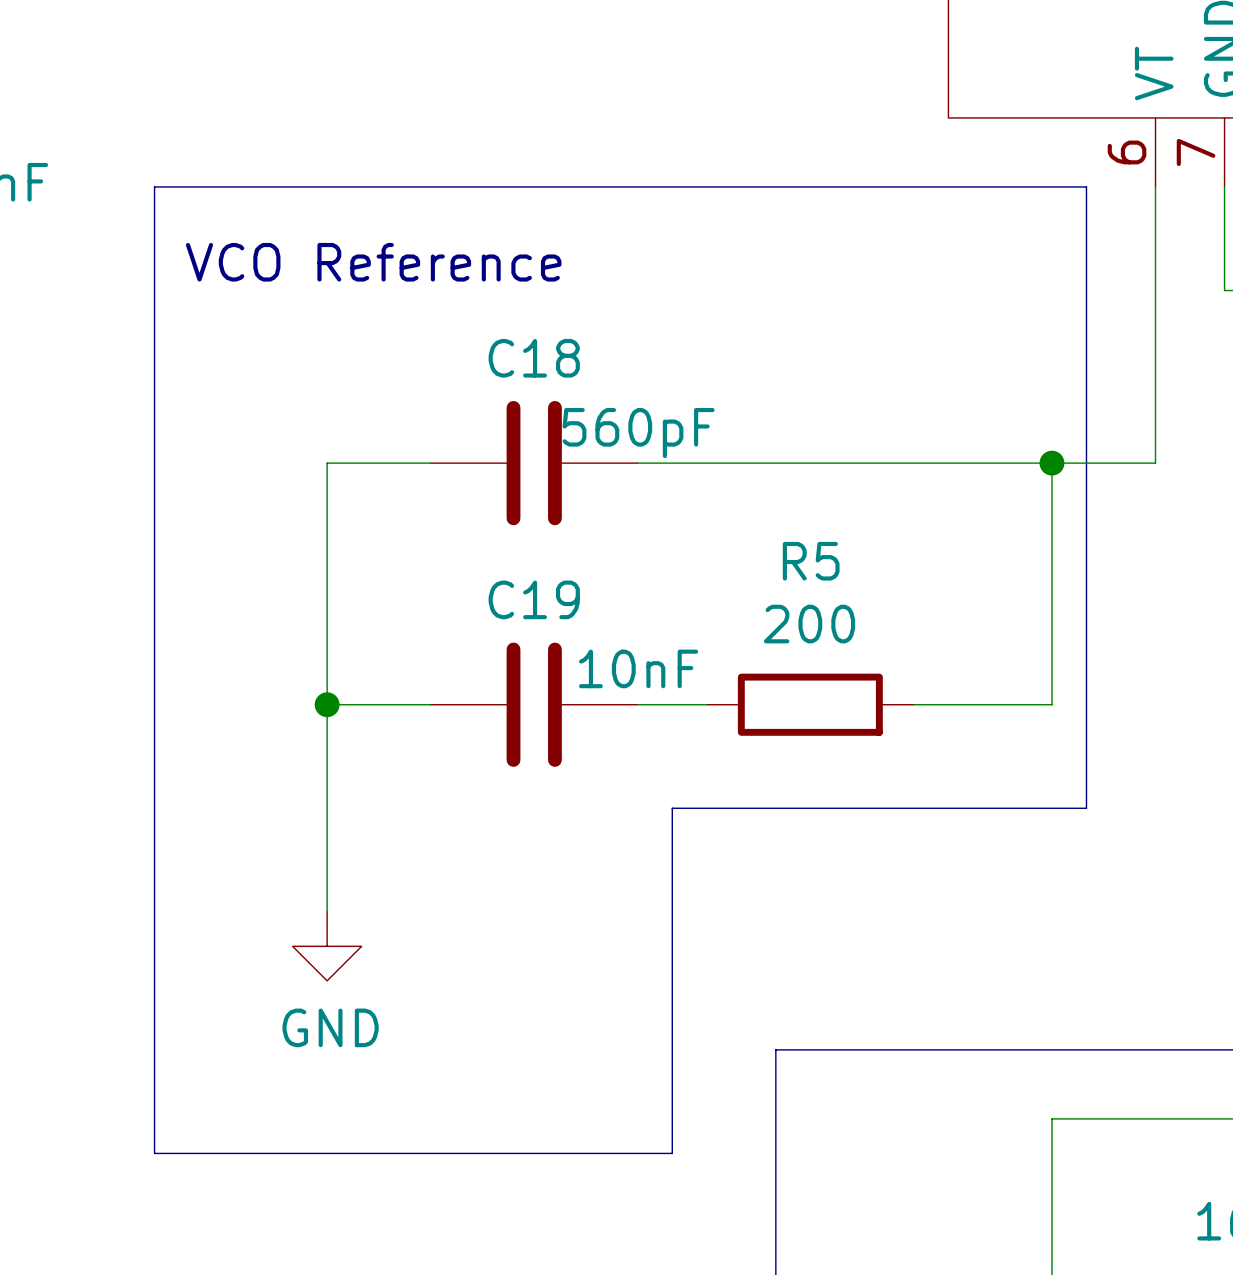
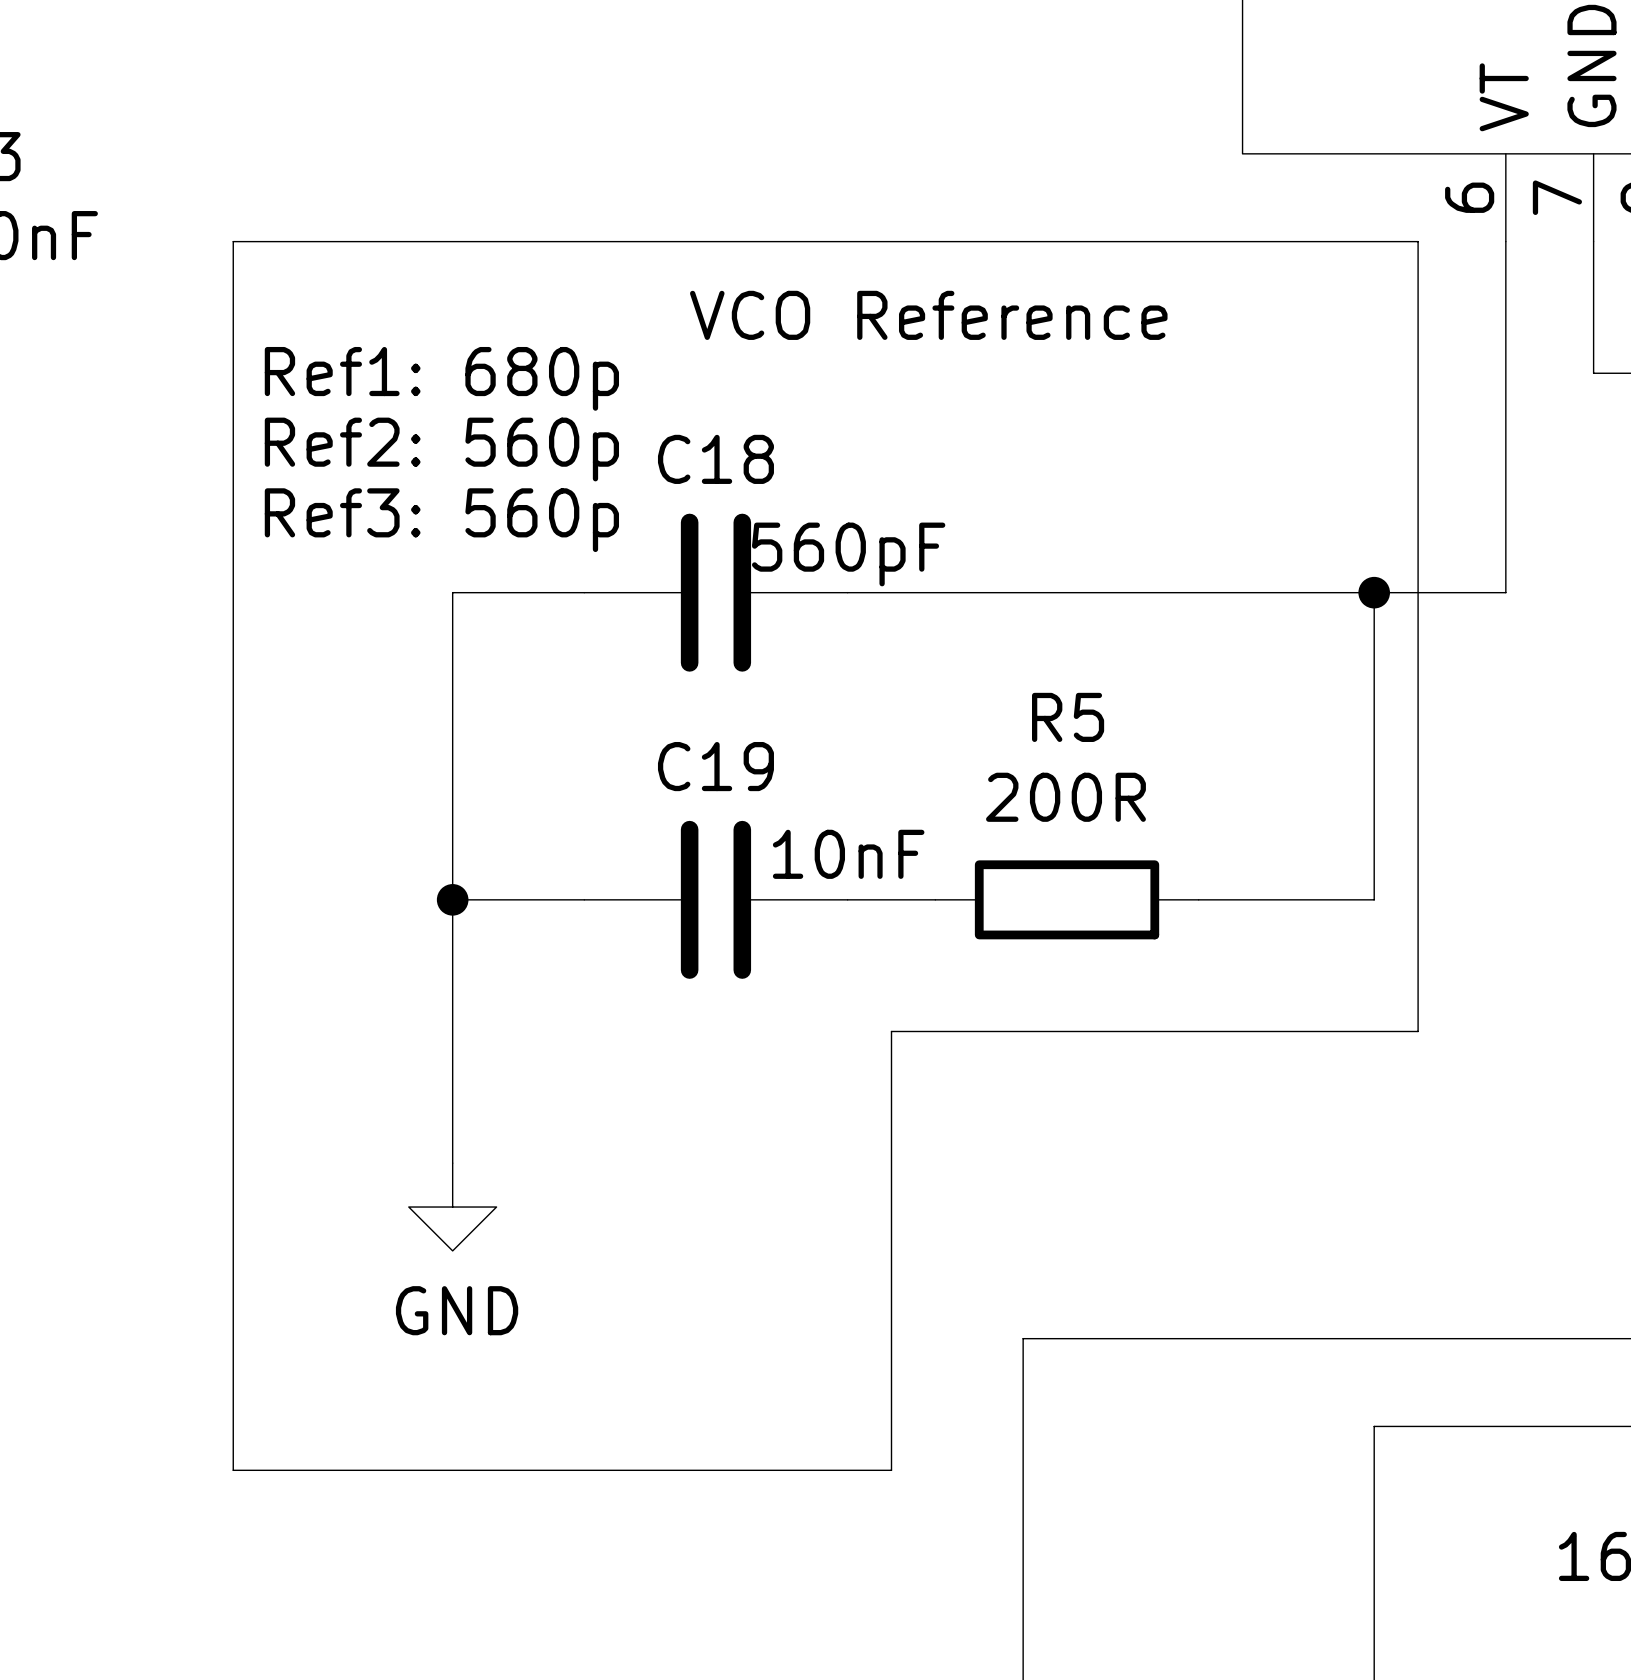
text position: VCO Reference (373, 262) -> VCO Reference (928, 315)
text: none -> Ref1: 680p (441, 378)
text: none -> Ref2: 560p (441, 449)
text: none -> Ref3: 560p (441, 520)
R5 value: 200 (809, 624) -> 200R (1065, 797)

